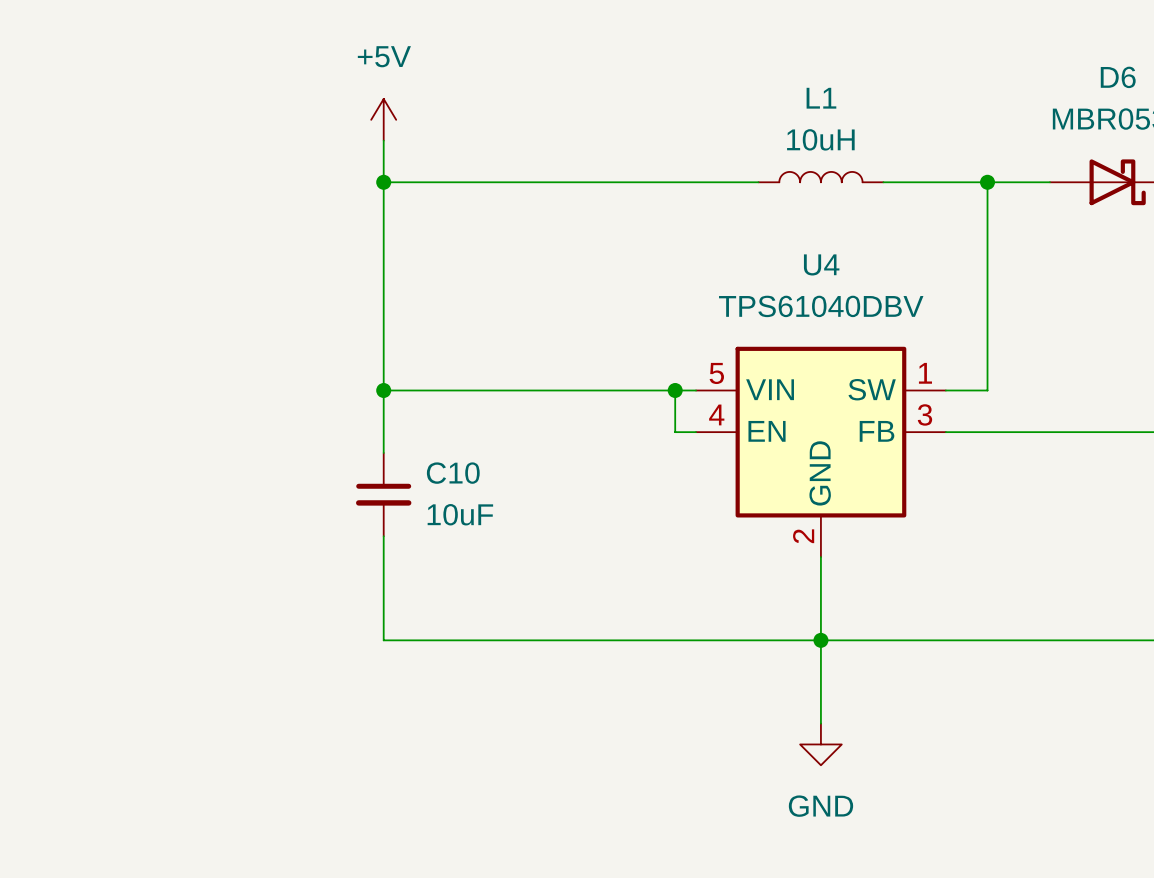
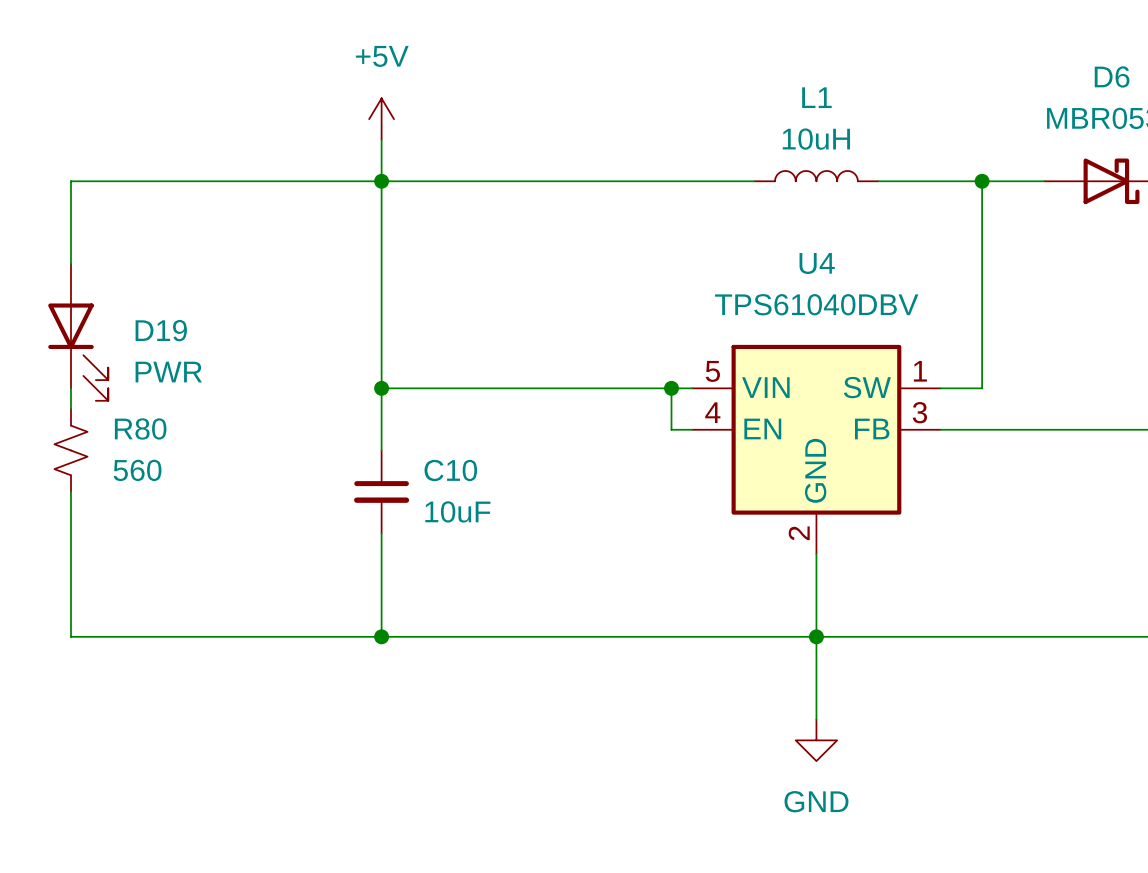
wire: none -> (381, 181) (70, 181) (70, 264)
D19: none -> PWR (78, 332)
wire: none -> (70, 388) (70, 409)
R80: none -> 560 (70, 450)
wire: none -> (70, 491) (70, 636) (381, 636)
junction: none -> (381, 636)

